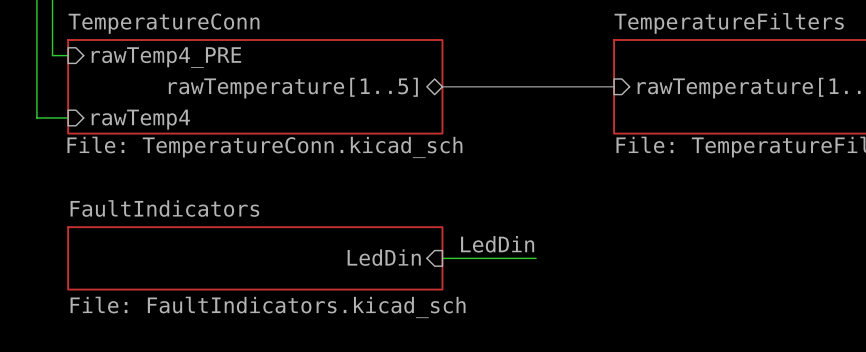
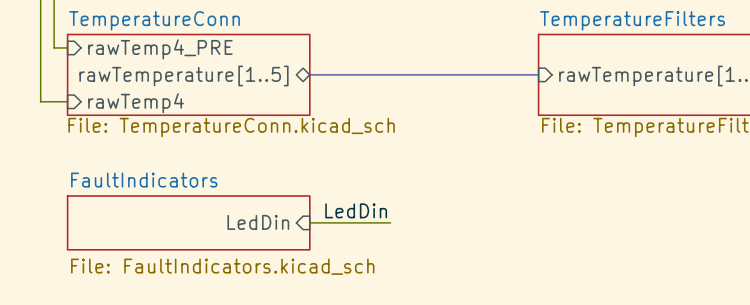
sheet TemperatureConn: none -> File: TemperatureConn.kicad_sch (188, 74)
sheet TemperatureConn: File: TemperatureConn.kicad_sch (255, 86) -> none
bus: none -> (309, 74) (390, 74)
sheet pin position: rawTemperature[1..5] (293, 88) -> rawTemperature[1..5] (184, 75)
label position: LedDin (497, 244) -> LedDin (356, 210)
sheet pin position: LedDin (384, 257) -> LedDin (258, 222)
sheet FaultIndicators: none -> File: FaultIndicators.kicad_sch (188, 222)
sheet FaultIndicators: File: FaultIndicators.kicad_sch (255, 258) -> none
wire: (442, 258) (536, 258) -> (390, 222) (309, 222)

